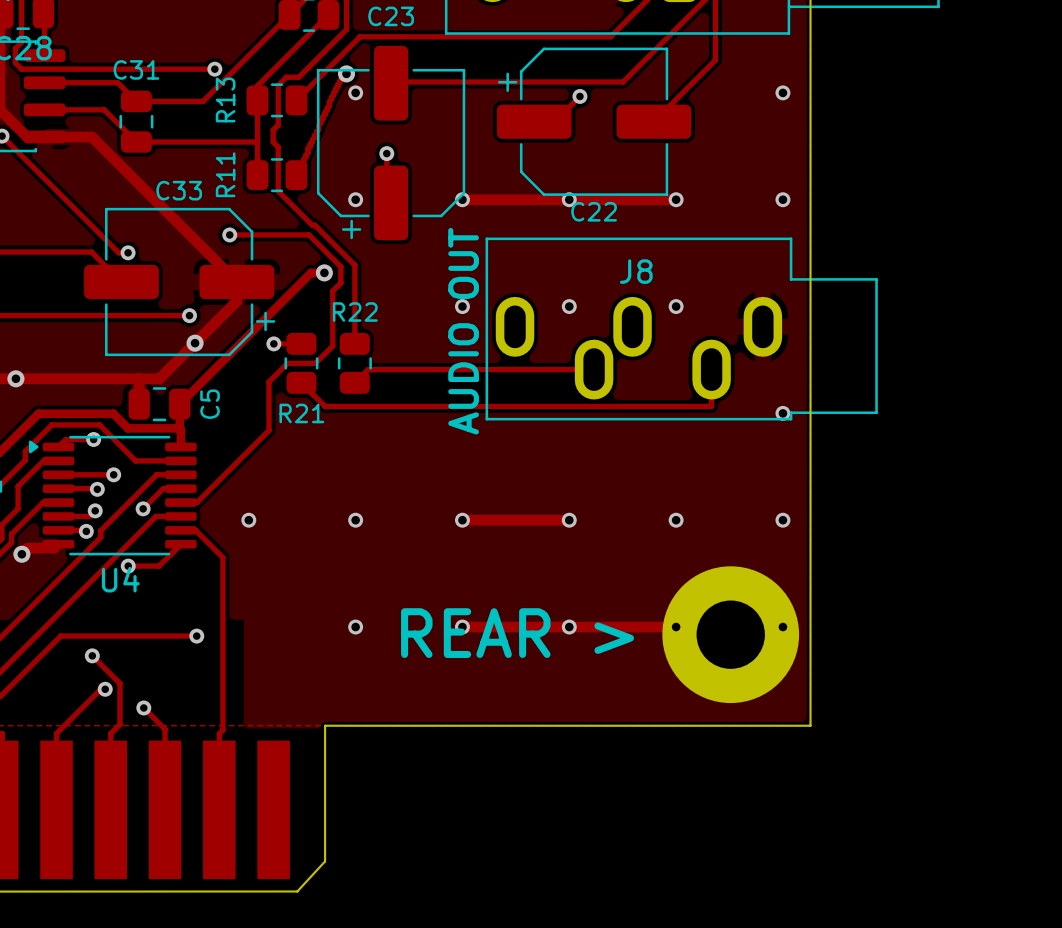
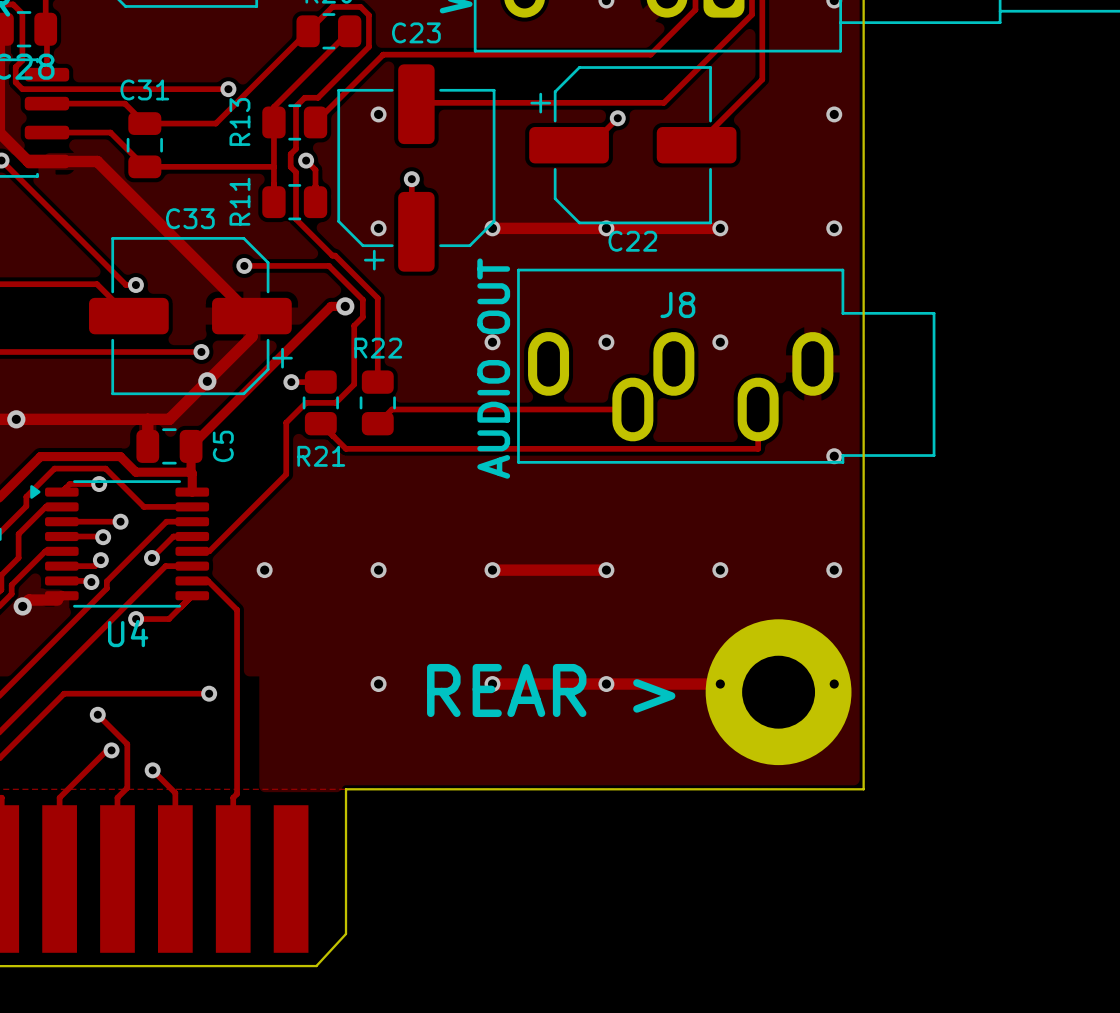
track: (346, 73) (340, 80) (329, 101) (329, 105) (296, 175) -> (306, 160) (315, 169) (315, 202)
via: (346, 73) -> none
via: none -> (306, 160)

